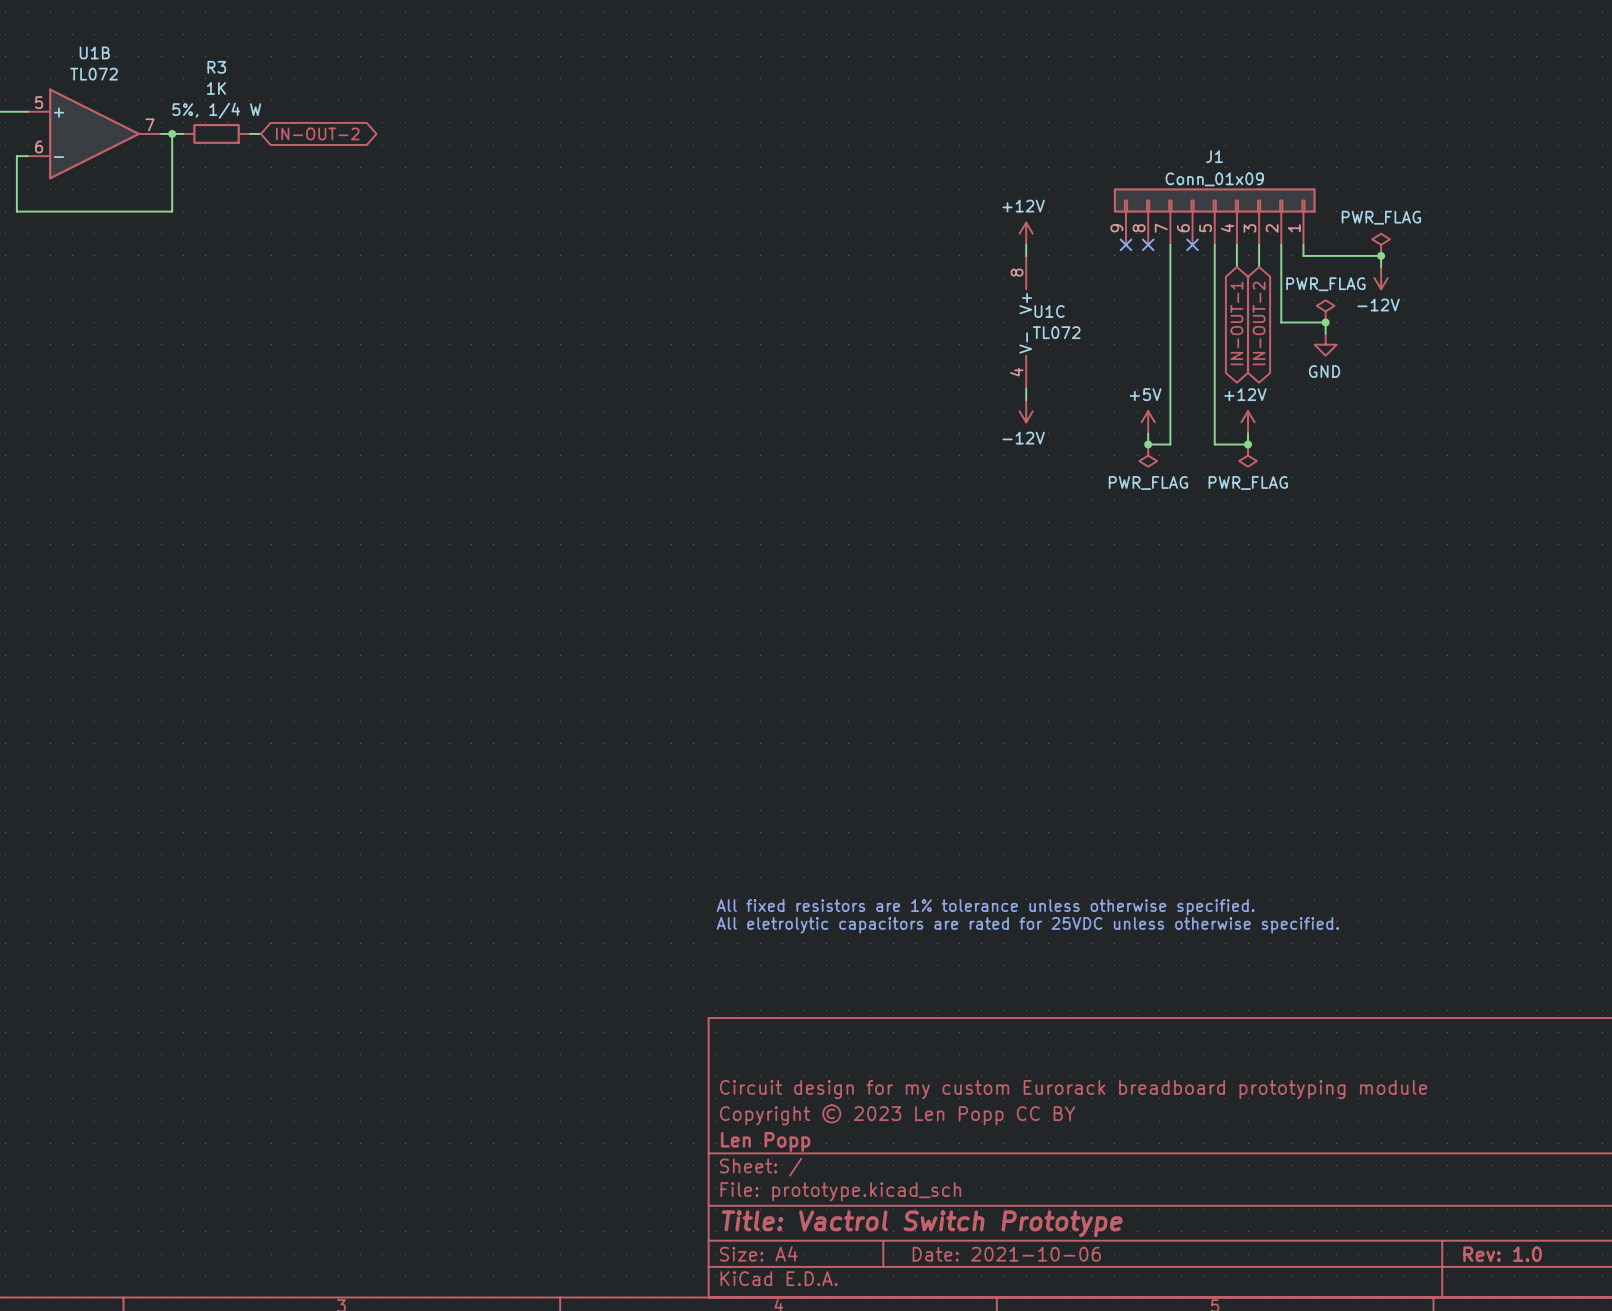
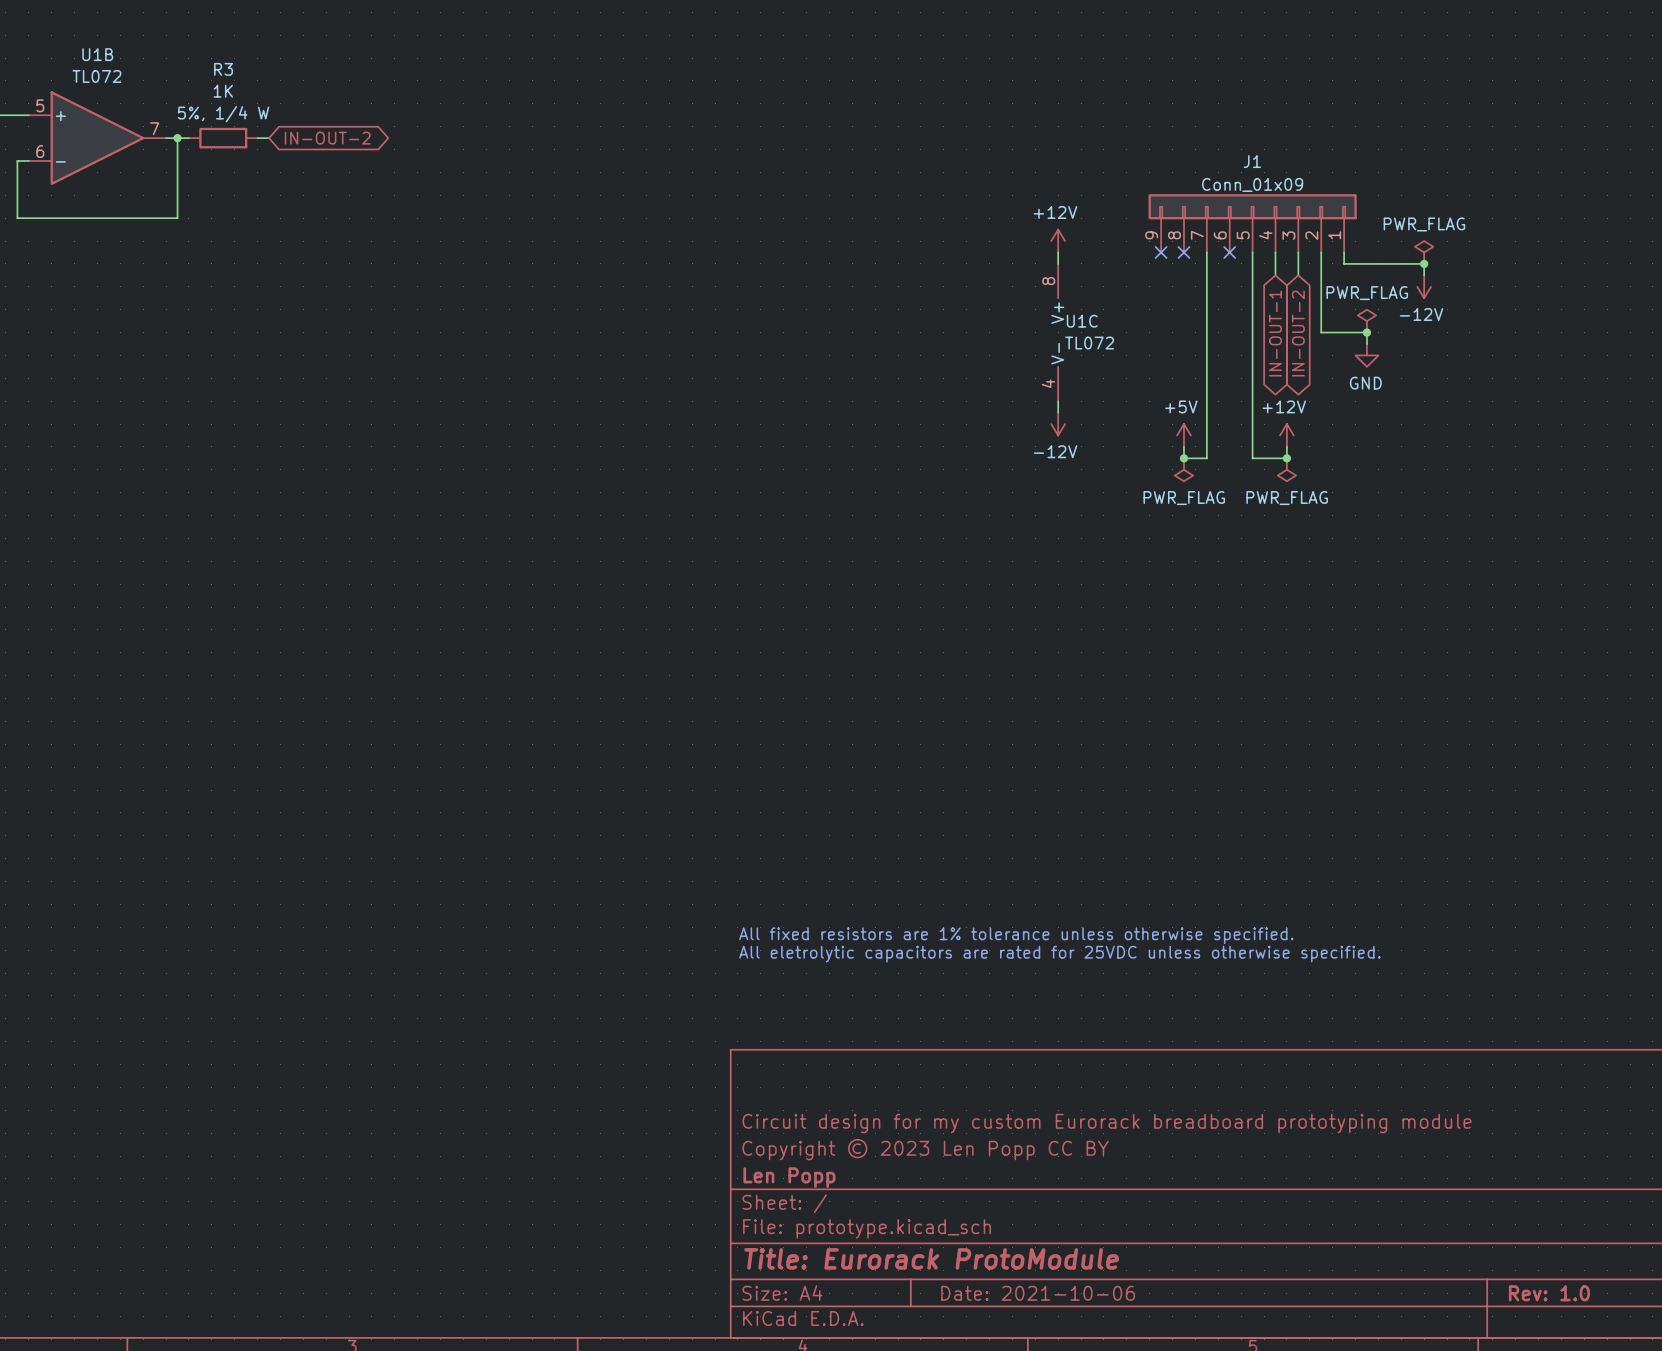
title block: Title: Vactrol Switch Prototype (922, 1223) -> Title: Eurorack ProtoModule (931, 1258)

